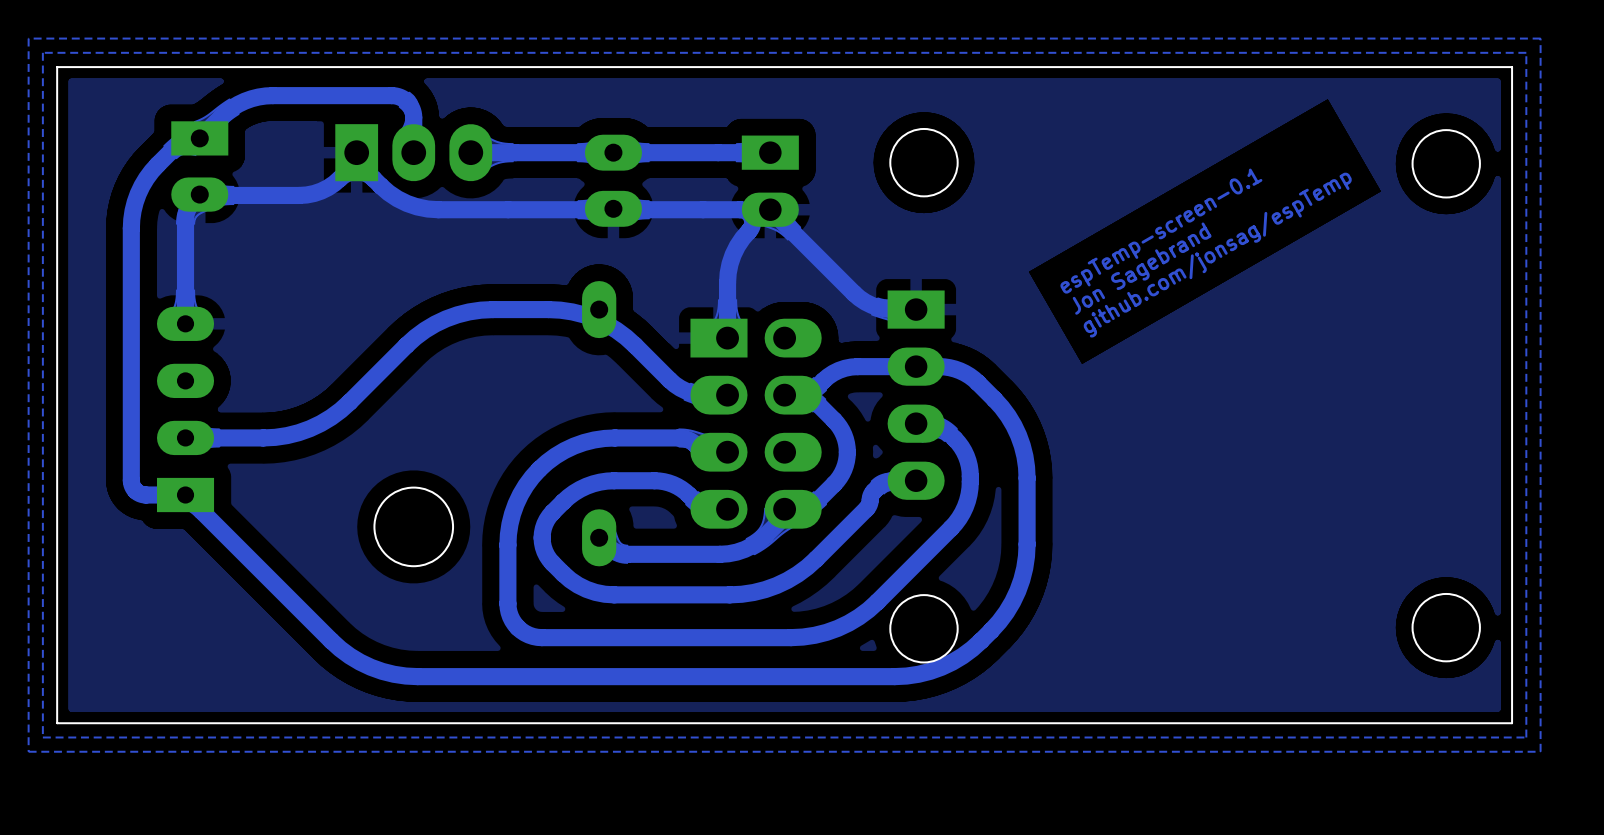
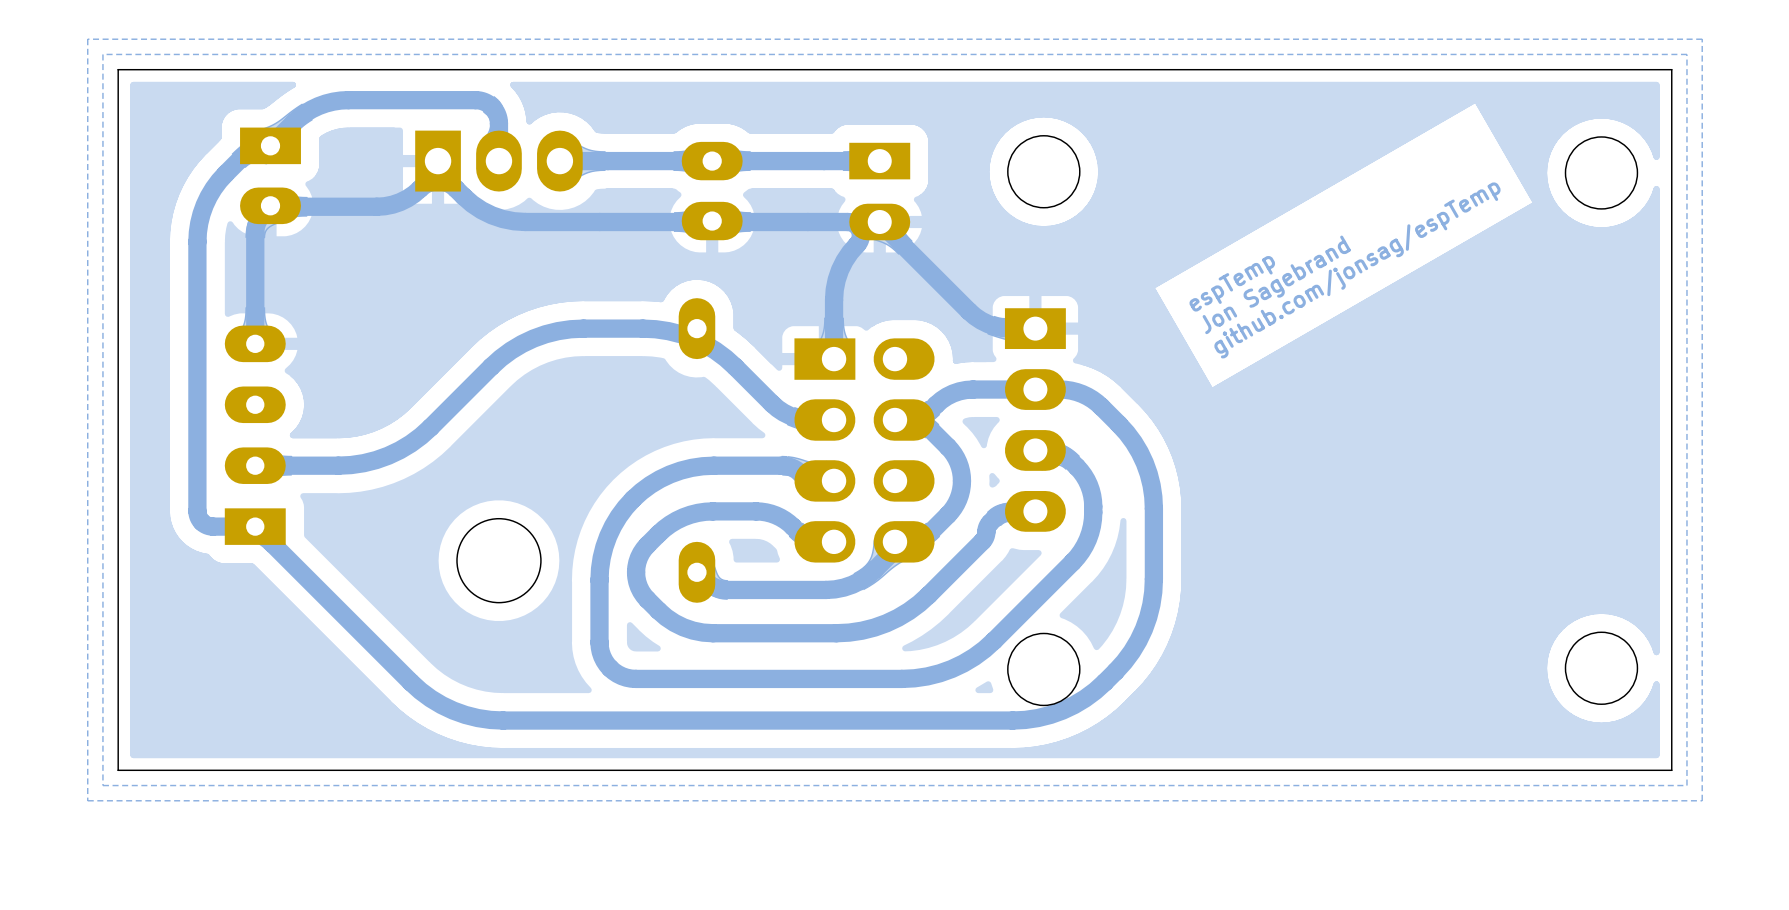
text: espTemp-screen-0.1 (1161, 231) -> espTemp (1232, 283)

